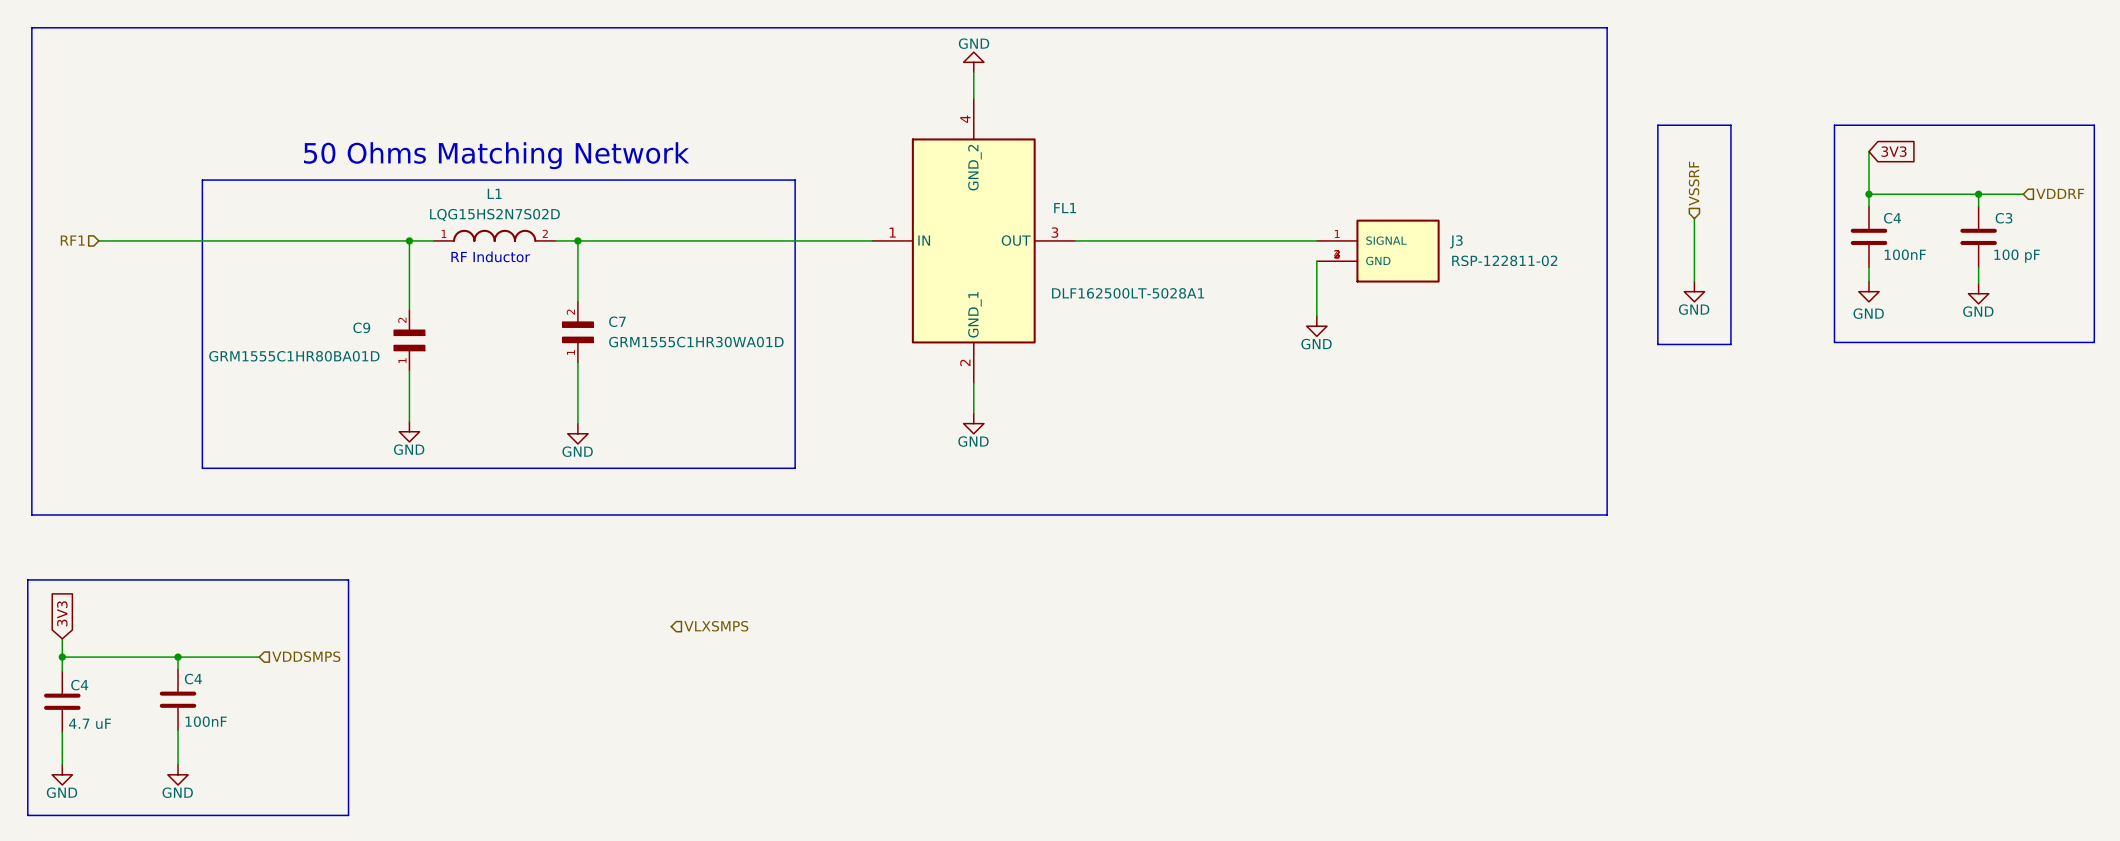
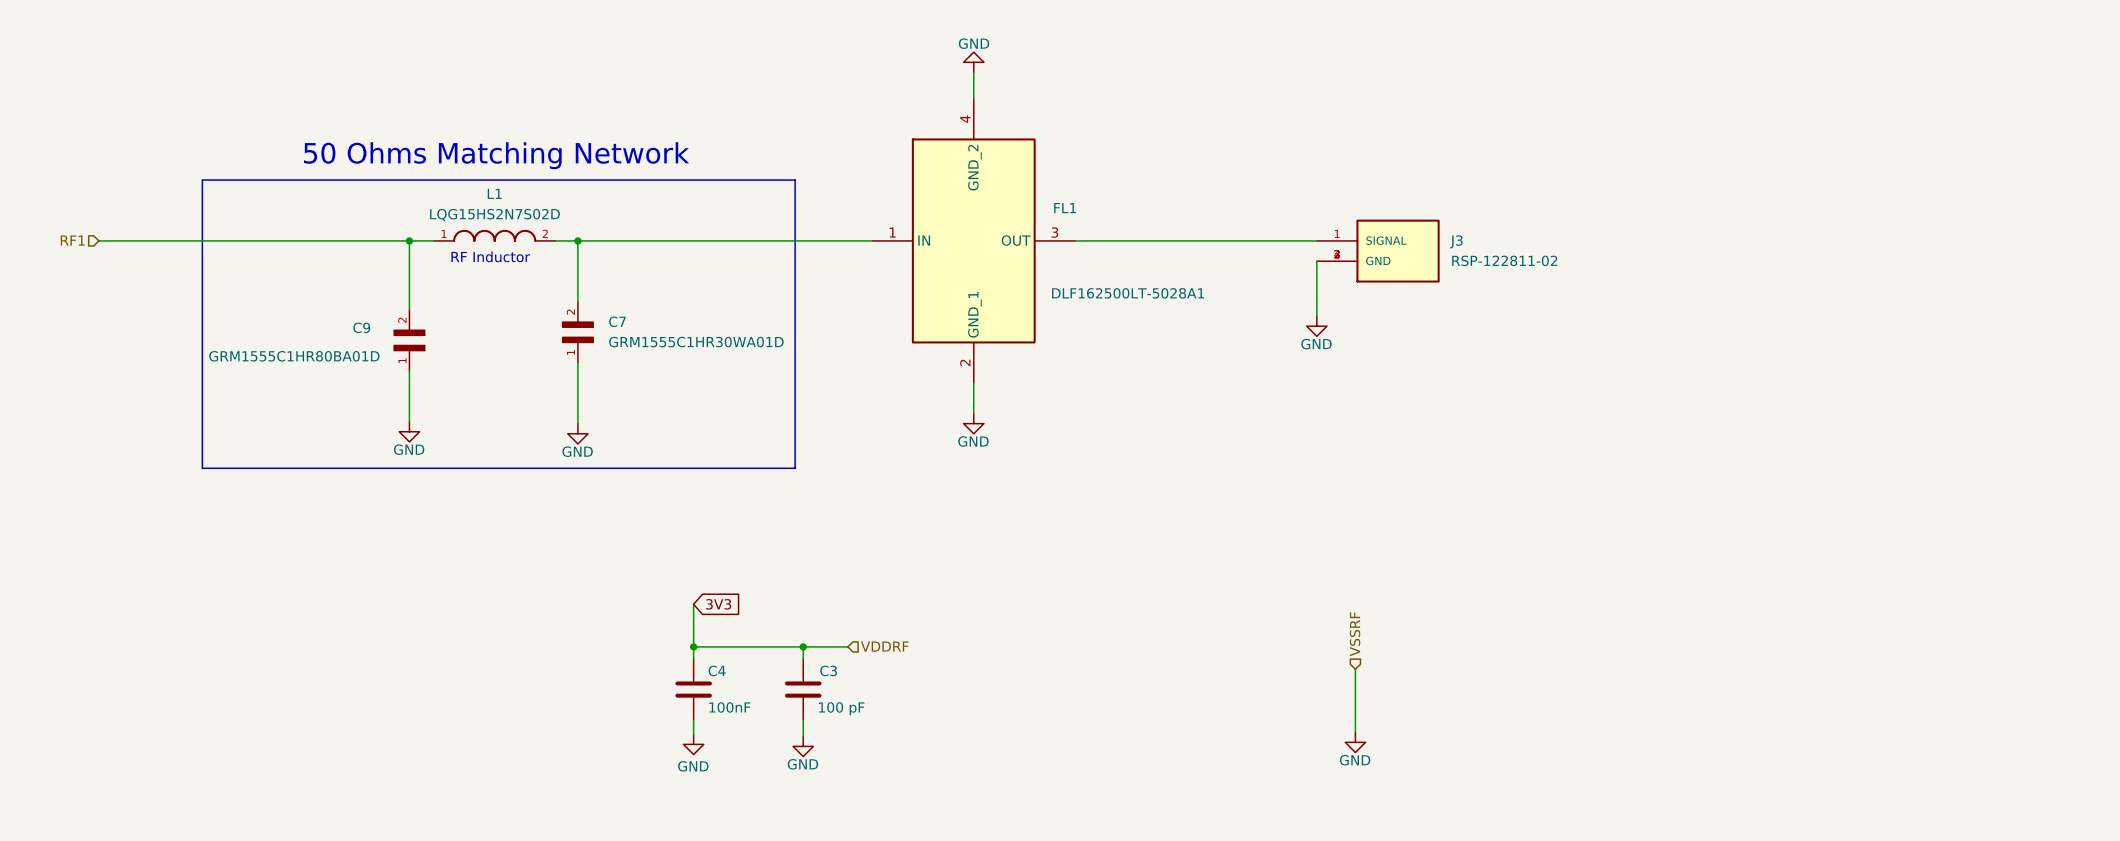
line: (31, 27) (1607, 27) (1607, 514) (31, 514) (31, 27) -> none
line: (1657, 125) (1730, 125) (1730, 344) (1657, 344) (1657, 125) -> none
line: (1834, 125) (2094, 125) (2094, 342) (1834, 342) (1834, 125) -> none
wire: (1868, 151) (1868, 206) -> none
global label: 3V3 (1894, 151) -> none
hierarchical label: VSSRF (1694, 183) -> none
hierarchical label: VDDRF (2060, 193) -> none
wire: (1868, 194) (2023, 194) -> none
junction: (1868, 194) -> none
wire: (1978, 194) (1978, 206) -> none
junction: (1978, 194) -> none
wire: (1694, 218) (1694, 281) -> none
C4: 100nF (1868, 236) -> none
C3 position: (1978, 236) -> (803, 689)
wire: (1868, 267) (1868, 281) -> none
wire: (1978, 267) (1978, 283) -> none
power symbol: GND (1694, 291) -> none
power symbol: GND (1868, 291) -> none
power symbol: GND (1978, 293) -> none
line: (27, 579) (348, 579) (348, 815) (27, 815) (27, 579) -> none
wire: none -> (693, 604) (693, 659)
global label: none -> 3V3 (718, 604)
global label: 3V3 (62, 613) -> none
hierarchical label: VLXSMPS (716, 626) -> none
hierarchical label: none -> VSSRF (1355, 634)
wire: (62, 638) (62, 671) -> none
wire: none -> (693, 646) (847, 646)
junction: none -> (693, 646)
wire: none -> (803, 646) (803, 659)
junction: none -> (803, 646)
hierarchical label: none -> VDDRF (884, 646)
hierarchical label: VDDSMPS (306, 656) -> none
wire: (62, 657) (259, 657) -> none
junction: (62, 657) -> none
wire: (178, 657) (178, 669) -> none
junction: (178, 657) -> none
wire: none -> (1355, 669) (1355, 732)
C4: none -> 100nF (693, 689)
C4: 100nF (178, 699) -> none
C4: 4.7 uF (62, 701) -> none
wire: none -> (693, 720) (693, 734)
wire: none -> (803, 720) (803, 736)
wire: (178, 730) (178, 764) -> none
wire: (62, 732) (62, 764) -> none
power symbol: none -> GND (1355, 742)
power symbol: none -> GND (693, 744)
power symbol: none -> GND (803, 746)
power symbol: GND (62, 774) -> none
power symbol: GND (178, 774) -> none

